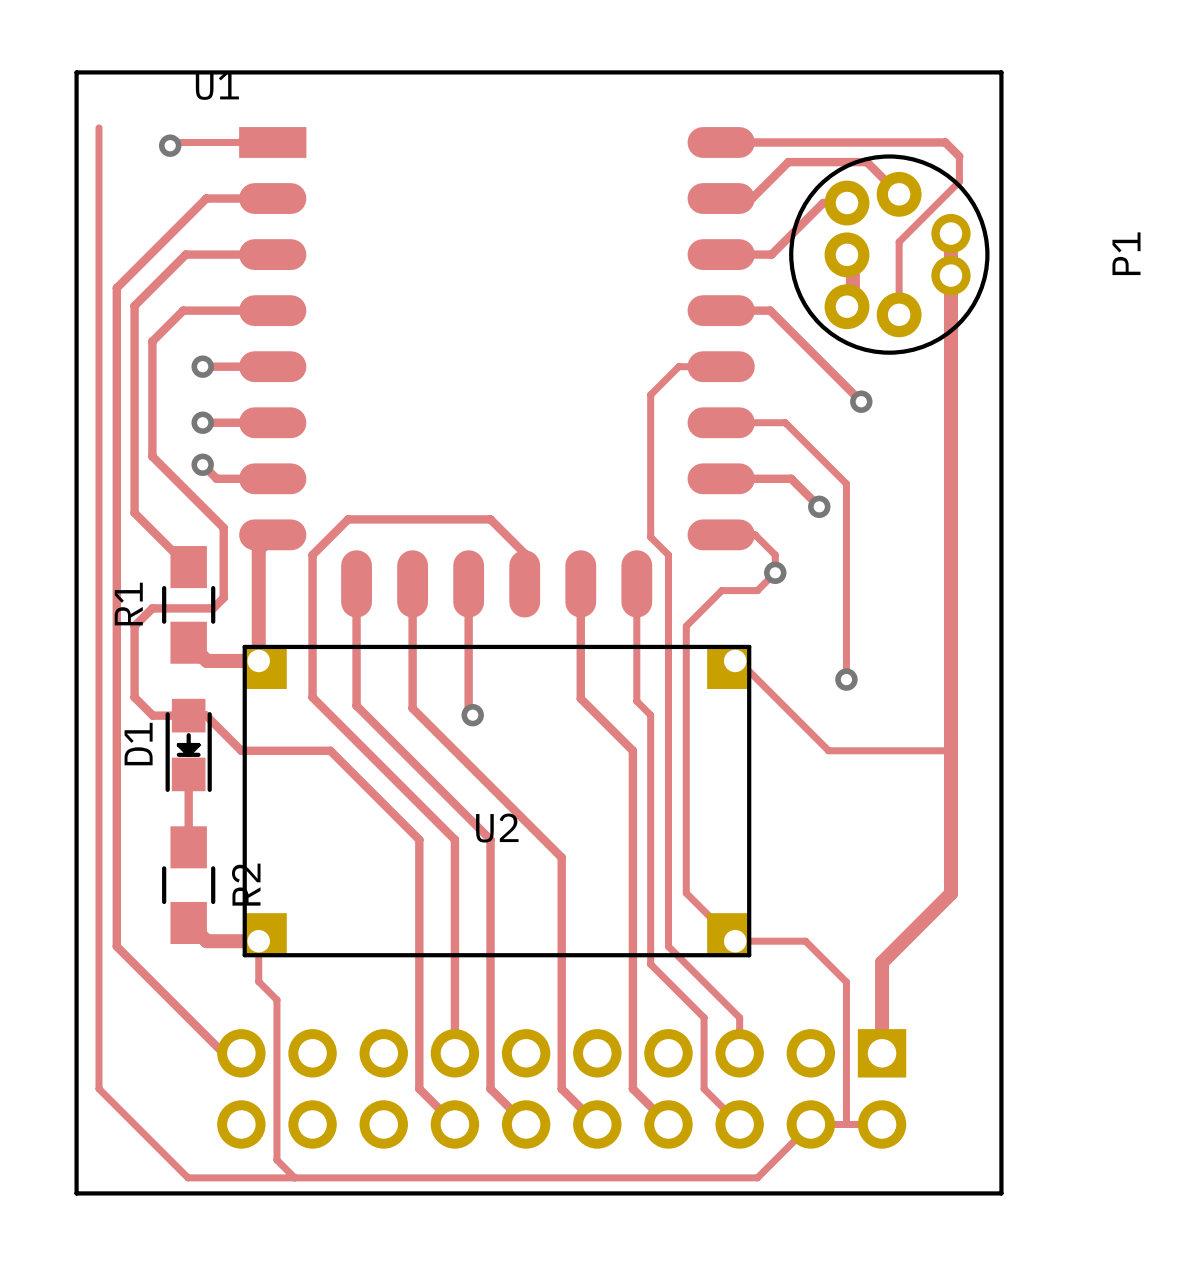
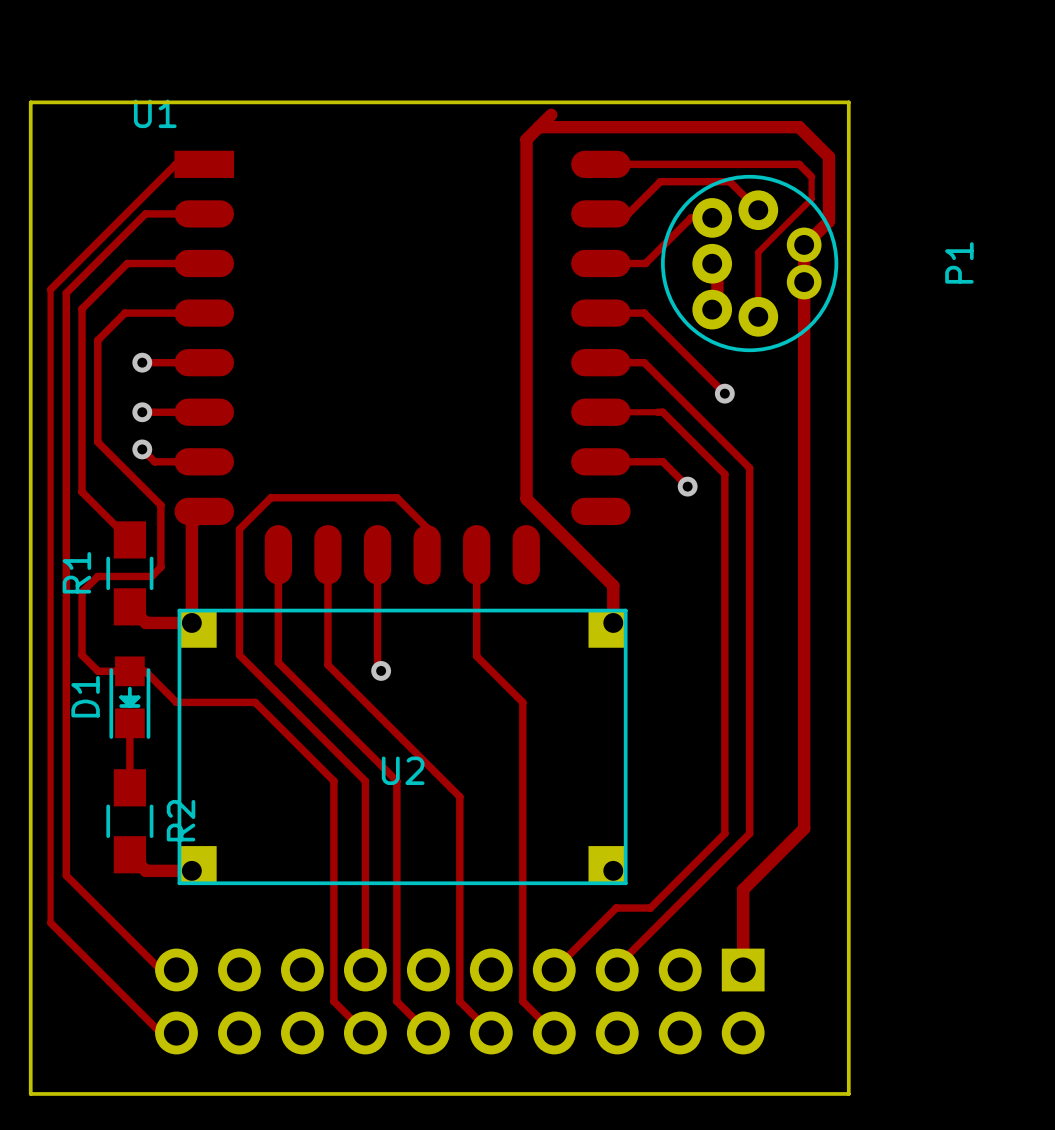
track: none -> (538, 127) (799, 127) (828, 156) (828, 221) (805, 244)
track: (99, 127) (99, 284) -> (175, 164) (50, 289)
track: (272, 142) (173, 142) (170, 145) -> none
via: (170, 145) -> none
track: (721, 366) (678, 366) (650, 394) (650, 537) (668, 555) (668, 946) (739, 1017) (739, 1053) -> (600, 362) (644, 362) (749, 468) (749, 833) (617, 966)
track: (785, 422) (846, 483) (846, 679) -> (657, 412) (662, 412) (724, 474) (724, 833) (650, 908) (616, 908) (554, 970)
track: (721, 534) (755, 534) (775, 555) (775, 572) (757, 590) (721, 590) (686, 626) (686, 893) (734, 941) (805, 941) (846, 982) (846, 1124) -> none
via: (775, 572) -> none
track: (636, 583) (636, 701) (650, 715) (650, 964) (704, 1017) (704, 1088) (739, 1124) -> none
track: (735, 660) (738, 660) (828, 750) (950, 750) -> (613, 622) (613, 585) (526, 499) (526, 139) (551, 114)
via: (846, 679) -> none
track: (258, 941) (258, 981) (276, 999) (276, 1160) (294, 1177) -> none
track: (99, 999) (99, 1088) (187, 1177) (757, 1177) (810, 1124) (882, 1124) -> (50, 922) (160, 1032)

